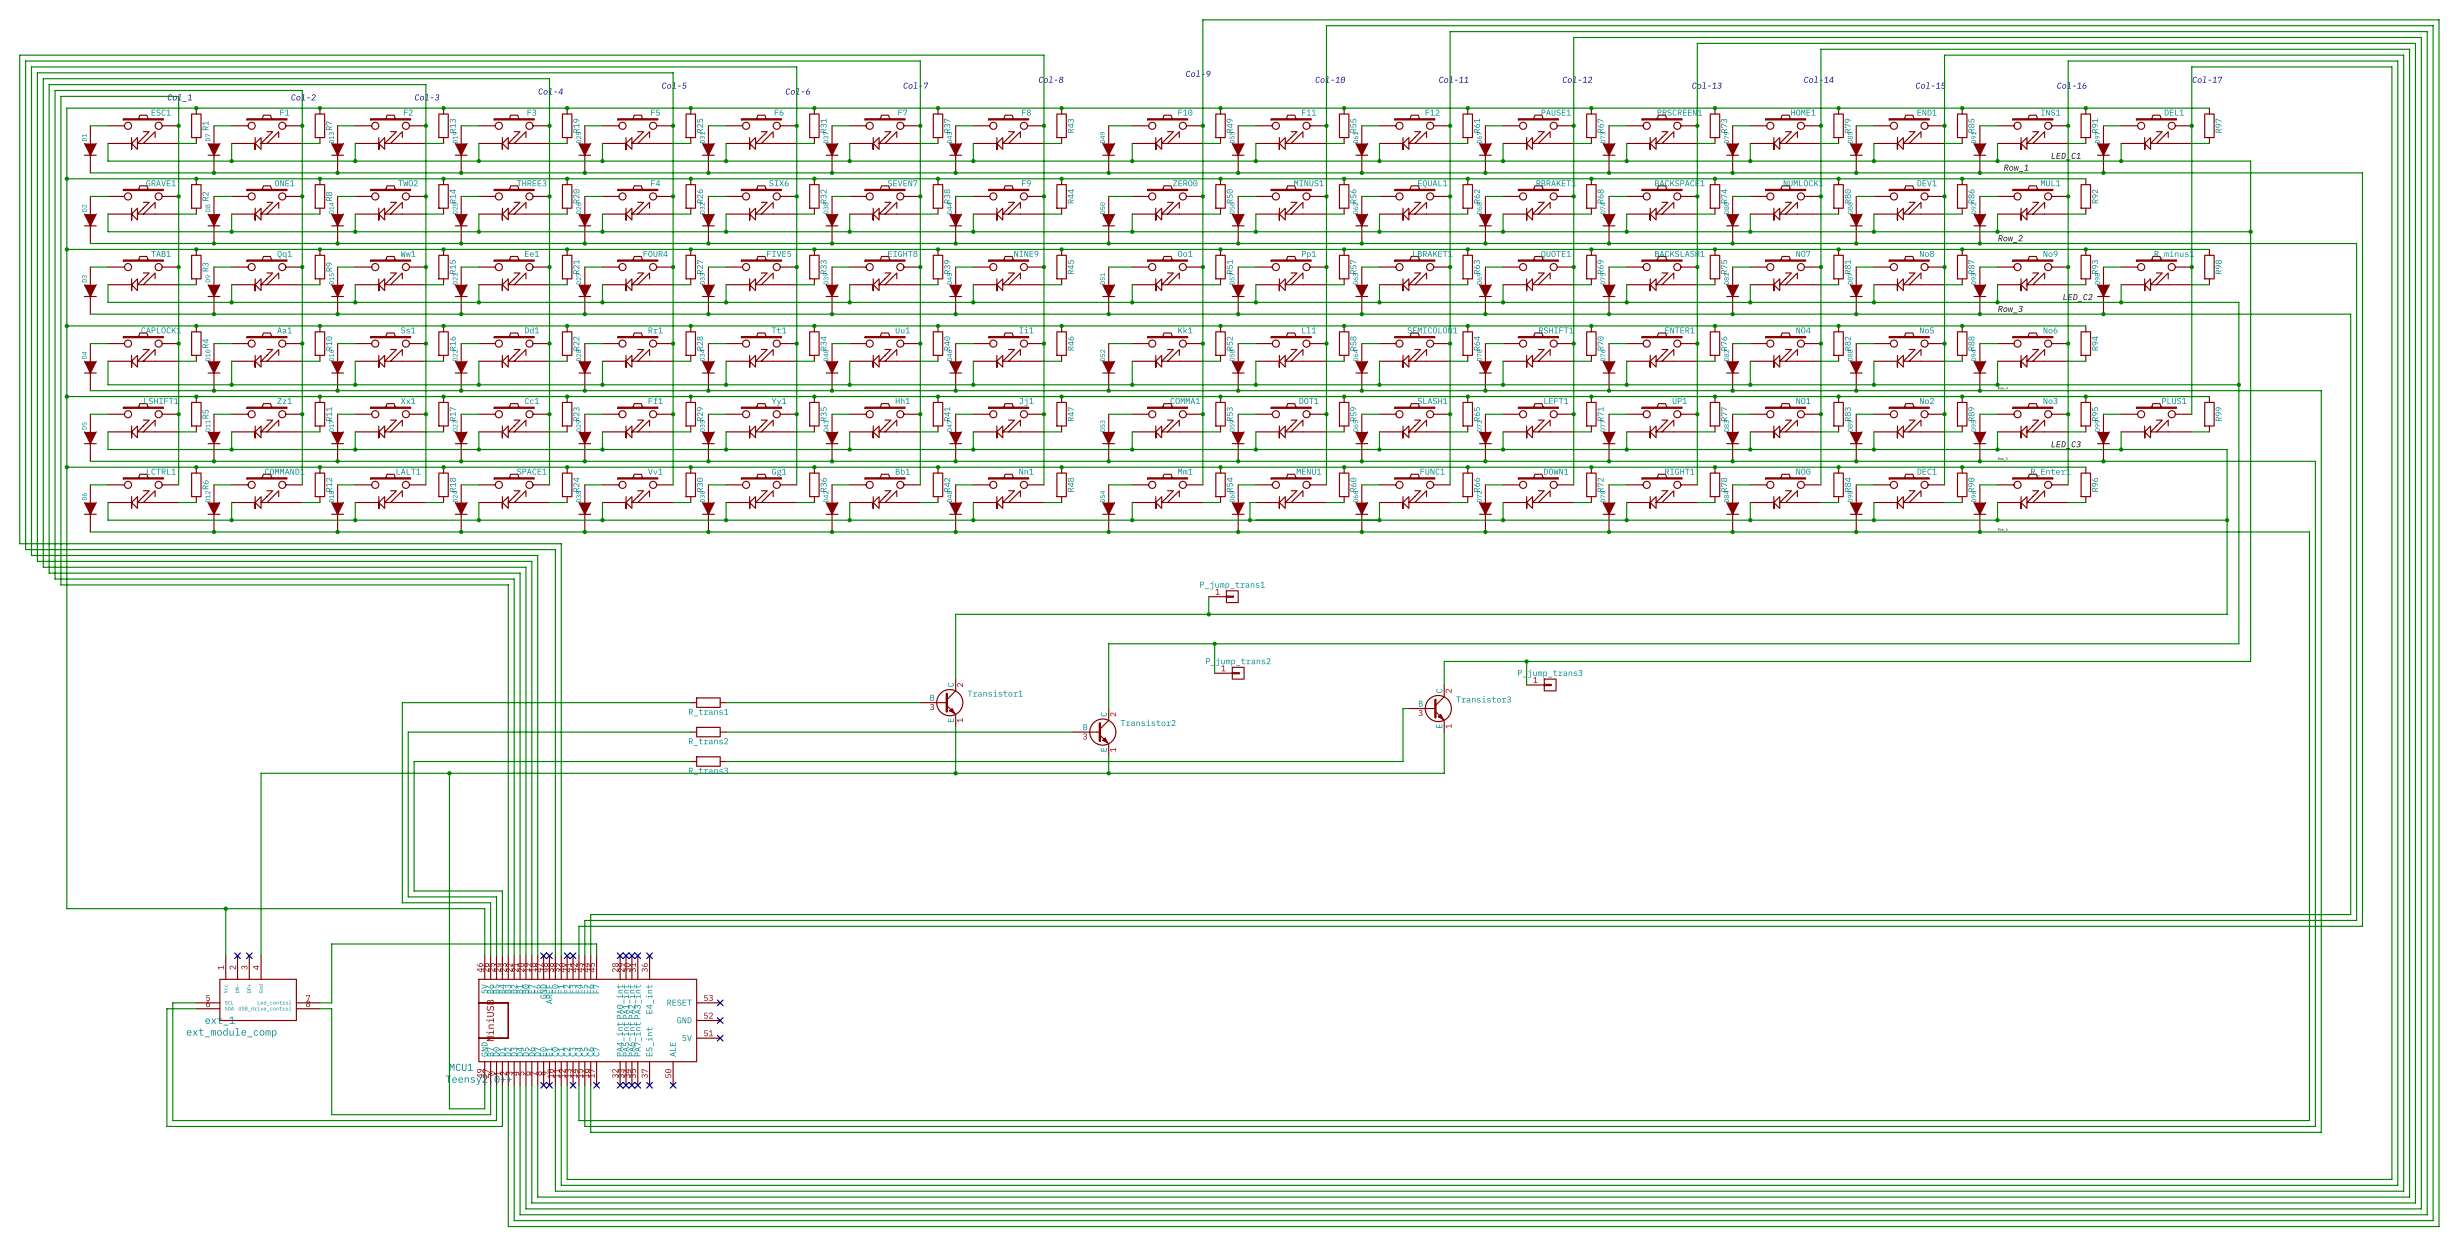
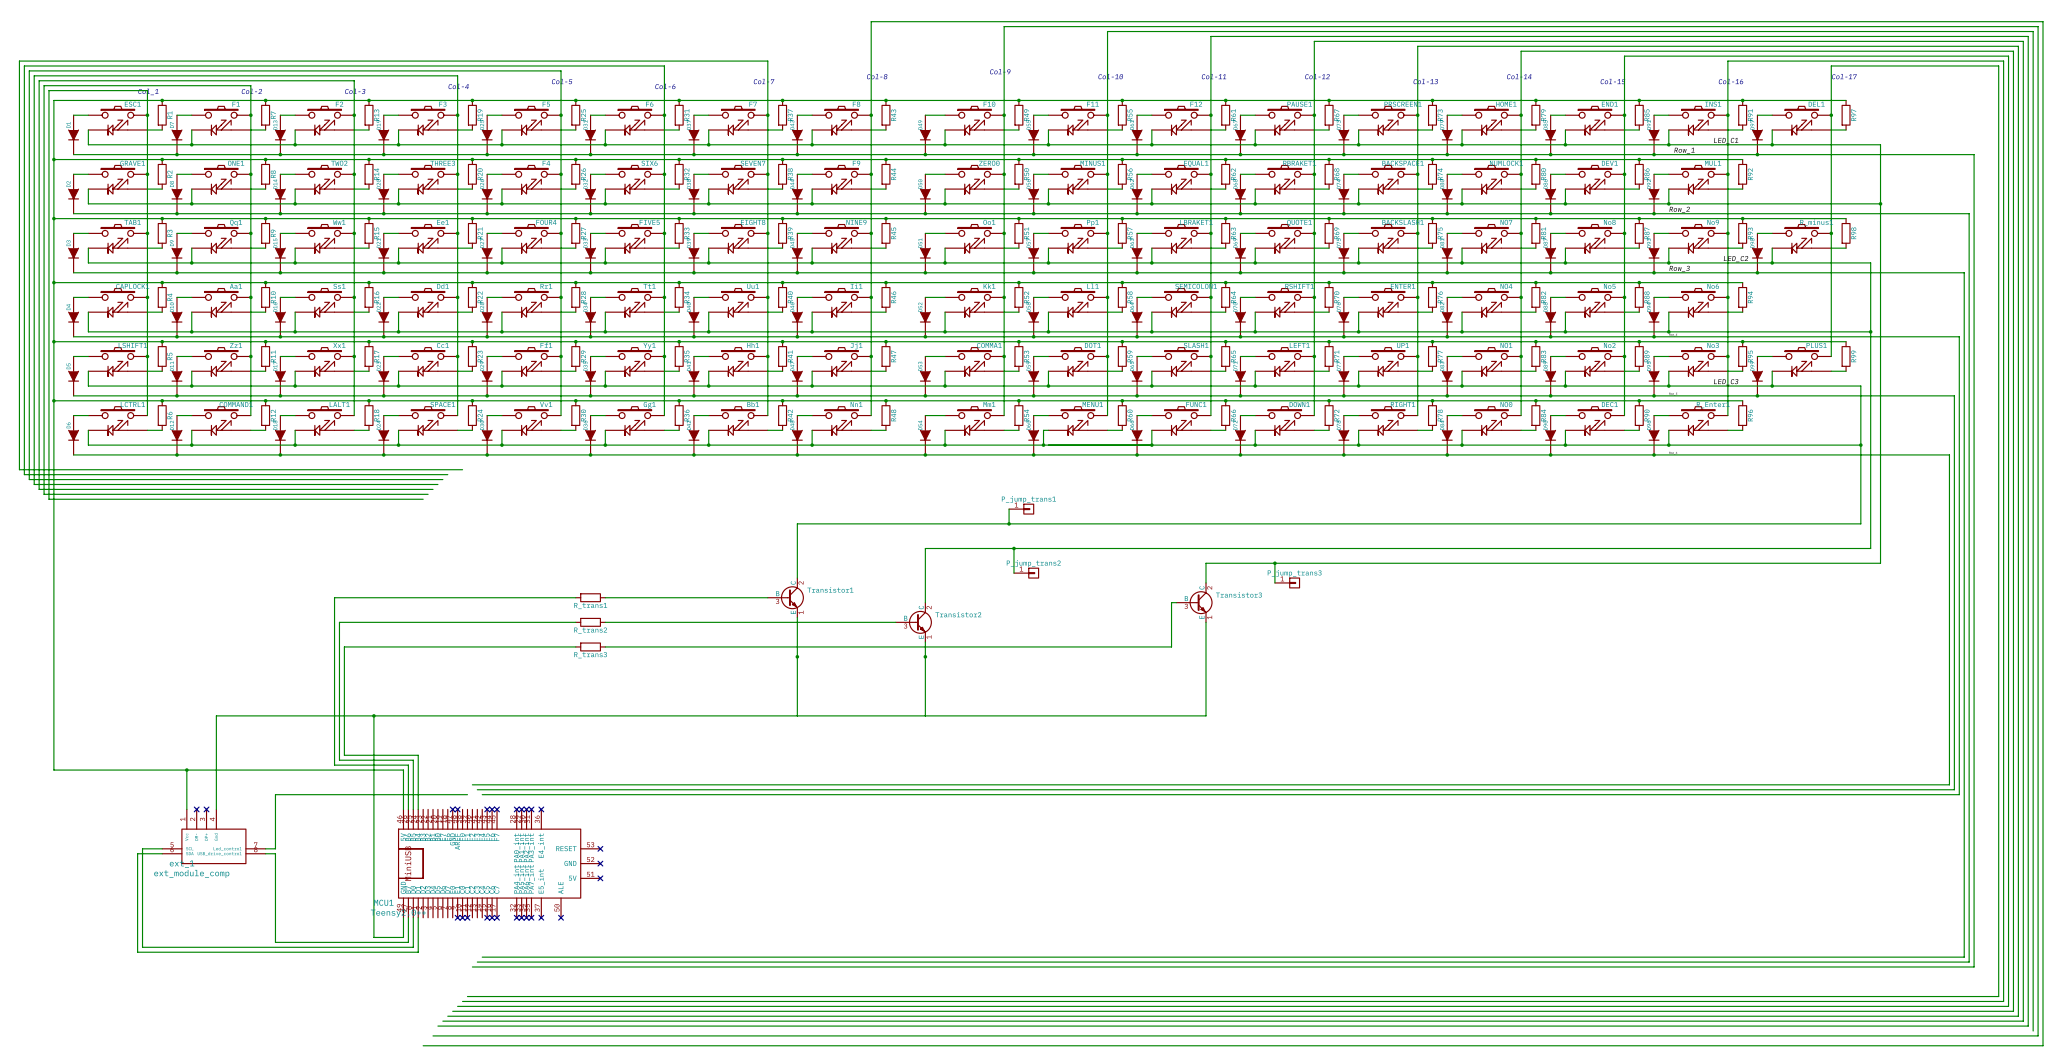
wire: (1043, 55) (19, 55) (19, 543) (561, 543) (561, 955) -> (871, 56) (871, 21) (2043, 21) (2043, 1045) (423, 1045)
wire: (2321, 390) (2321, 1132) -> (1964, 774) (1964, 957) (1939, 957)
wire: none -> (1939, 336) (1959, 336) (1959, 794) (482, 794)
wire: (2315, 461) (2315, 1126) (584, 1126) (584, 1085) -> (1934, 395) (1954, 395) (1954, 789) (477, 789)
wire: (2309, 531) (2309, 1120) (578, 1120) (578, 1085) -> none
wire: (555, 549) (555, 955) -> none
wire: (537, 555) (537, 955) -> none
wire: (531, 561) (531, 955) -> none
wire: (525, 567) (525, 955) -> none
wire: (520, 573) (520, 955) -> none
wire: (514, 579) (514, 955) -> none
wire: (508, 584) (508, 955) -> none
wire: (449, 773) (449, 843) -> none
junction: (449, 773) -> none
wire: none -> (797, 656) (797, 715)
wire: none -> (925, 656) (925, 715)
wire: (1444, 773) (261, 773) (261, 843) -> (1206, 656) (1206, 715) (216, 715)
junction: none -> (373, 715)
wire: (2350, 914) (590, 914) (590, 955) -> none
wire: (2356, 920) (584, 920) (584, 955) -> (1969, 779) (1969, 962) (477, 962)
wire: (578, 926) (578, 955) -> (482, 784) (472, 784)
wire: (2333, 926) (2362, 926) -> (1949, 784) (1949, 454) (1929, 454)
wire: none -> (1974, 784) (1974, 966) (472, 966)
wire: (331, 943) (596, 943) (596, 955) -> (275, 799) (275, 794) (467, 794)
no-connect mark: (567, 955) -> none
no-connect mark: (573, 955) -> none
no-connect mark: none -> (487, 809)
no-connect mark: none -> (492, 809)
no-connect mark: none -> (497, 809)
wire: (508, 1085) (508, 1226) (520, 1226) -> none
wire: (514, 1085) (514, 1220) (2433, 1220) -> none
wire: (520, 1085) (520, 1214) (525, 1214) -> none
wire: (525, 1085) (525, 1208) (531, 1208) -> none
wire: (531, 1085) (531, 1202) (537, 1202) -> none
wire: (537, 1085) (537, 1197) (543, 1197) -> none
no-connect mark: (543, 1085) -> none
wire: (555, 1085) (555, 1191) -> (457, 1006) (462, 1006)
no-connect mark: none -> (462, 917)
wire: (561, 1085) (561, 1185) -> (462, 1001) (467, 1001)
no-connect mark: none -> (467, 917)
wire: (567, 1085) (567, 1179) -> (467, 996) (472, 996)
no-connect mark: (573, 1085) -> none
no-connect mark: none -> (487, 917)
wire: (590, 1085) (590, 1132) -> (482, 957) (492, 957)
no-connect mark: none -> (492, 917)

